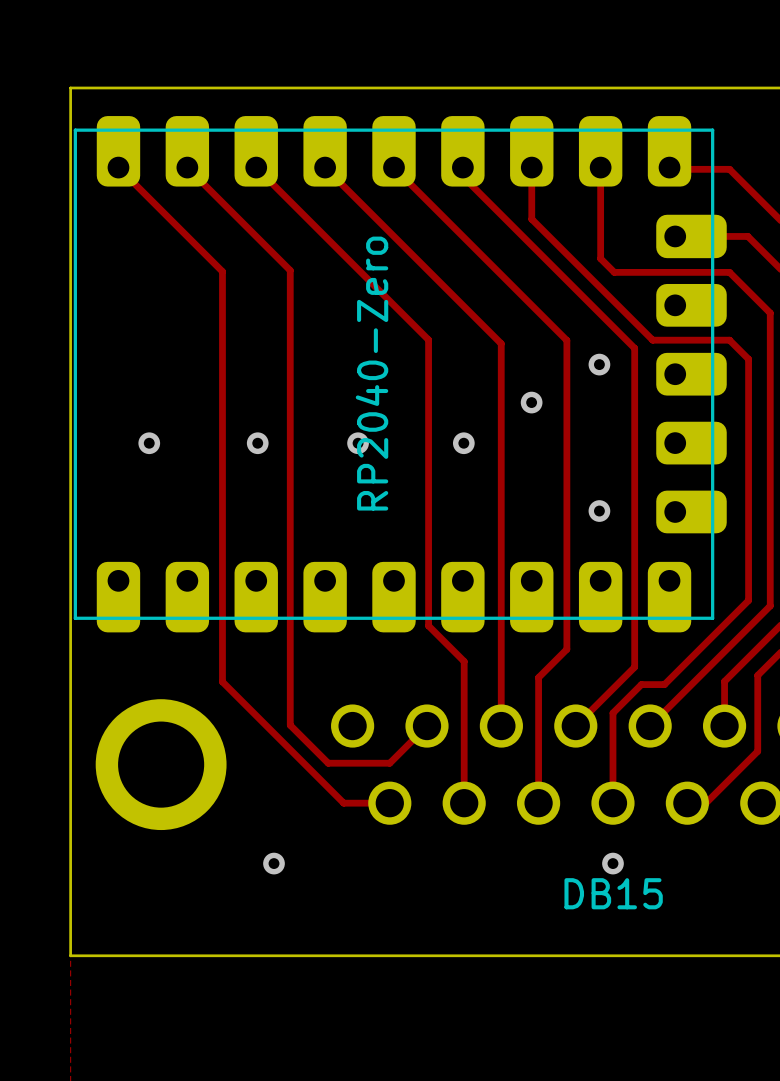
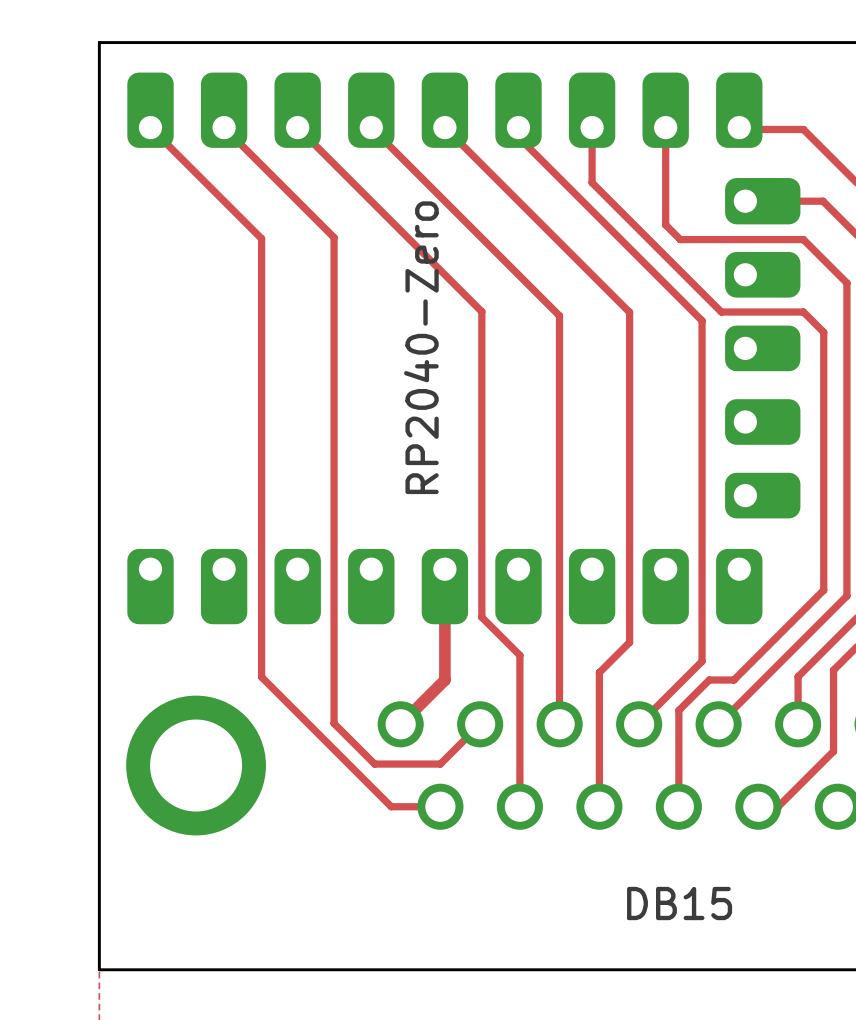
part footprint: [73, 116, 727, 633] -> [127, 72, 801, 625]
via: (599, 364) -> none
via: (531, 402) -> none
via: (149, 443) -> none
via: (257, 443) -> none
via: (358, 443) -> none
via: (463, 443) -> none
via: (599, 511) -> none
track: none -> (444, 569) (444, 680) (400, 724)
via: (274, 863) -> none
via: (612, 863) -> none

